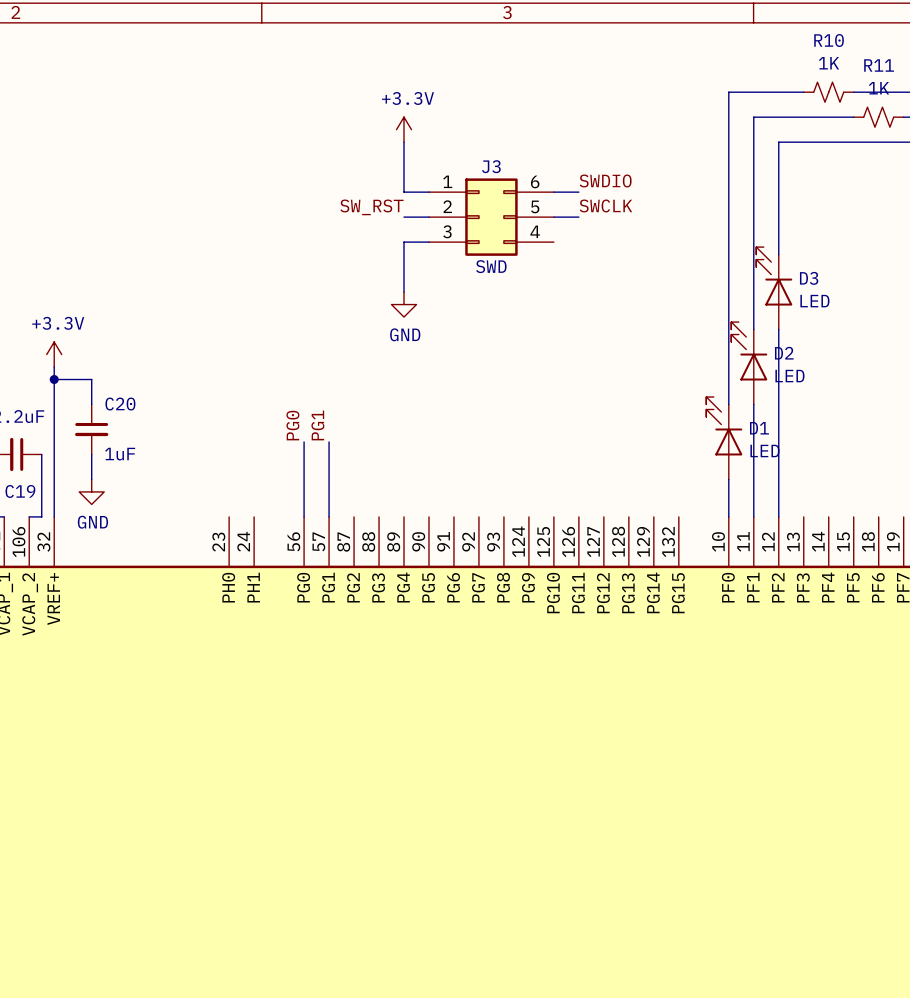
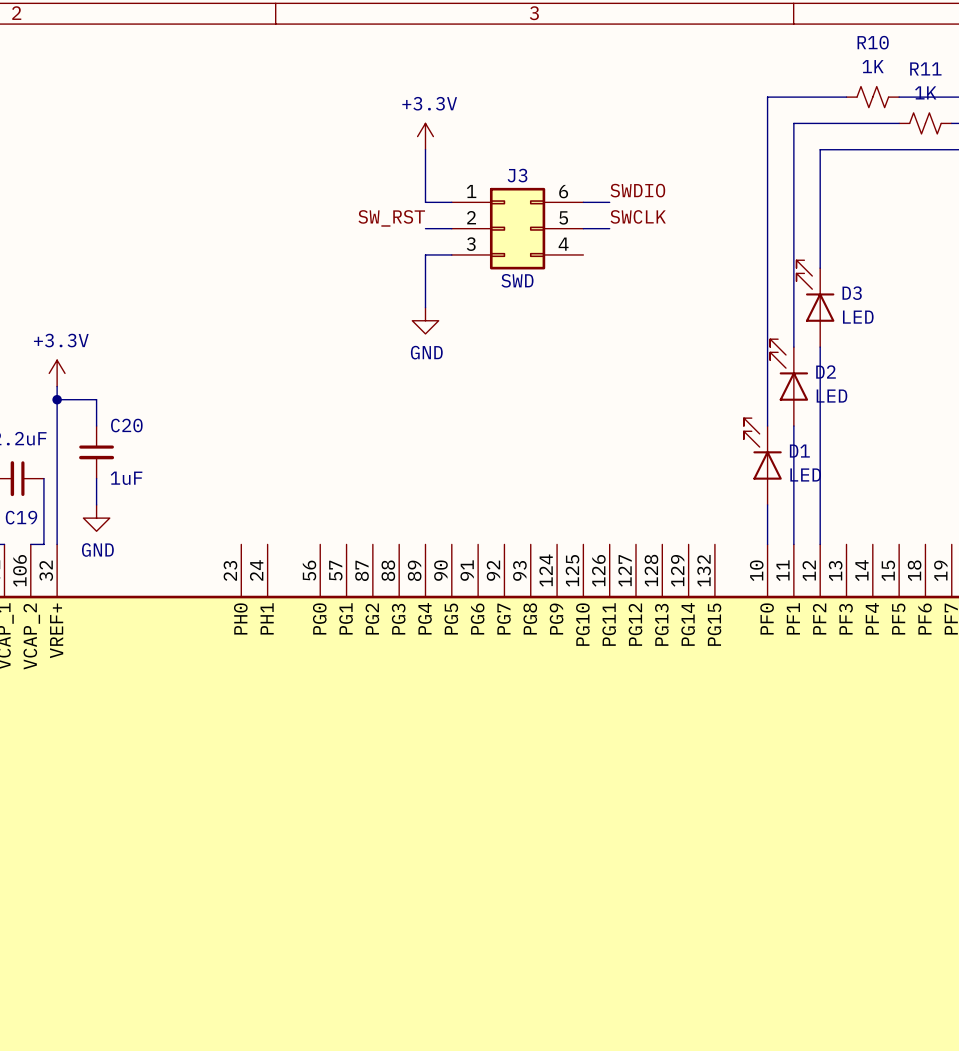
label: PG0 (292, 425) -> none
label: PG1 (317, 425) -> none
wire: (304, 441) (304, 516) -> none
wire: (329, 441) (329, 516) -> none

